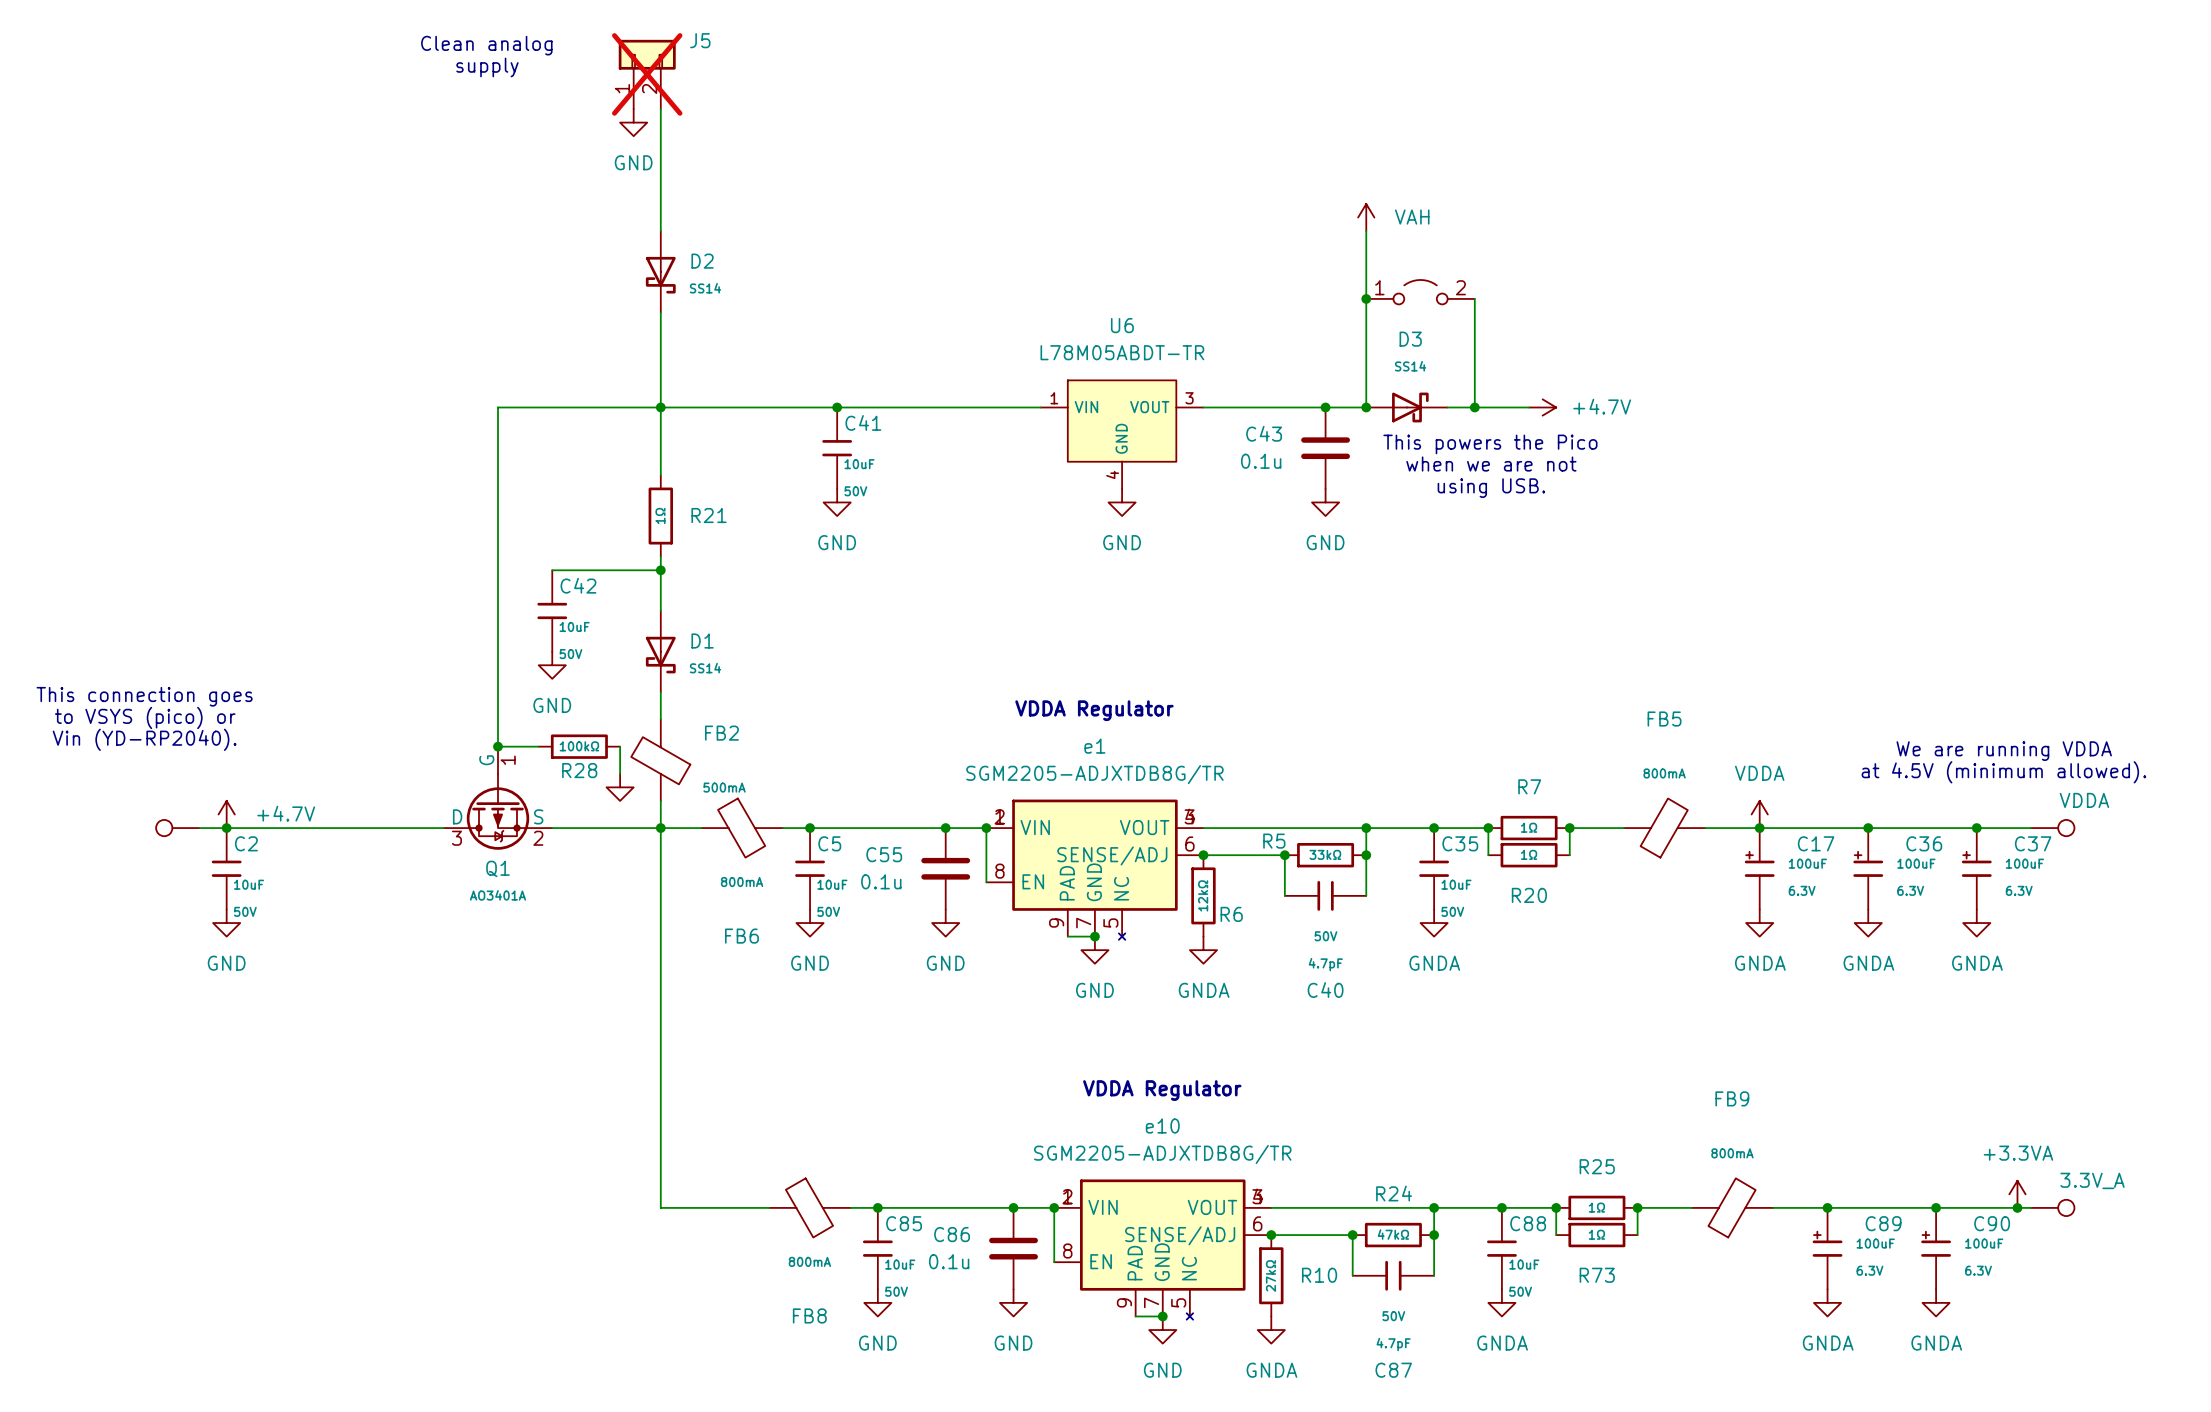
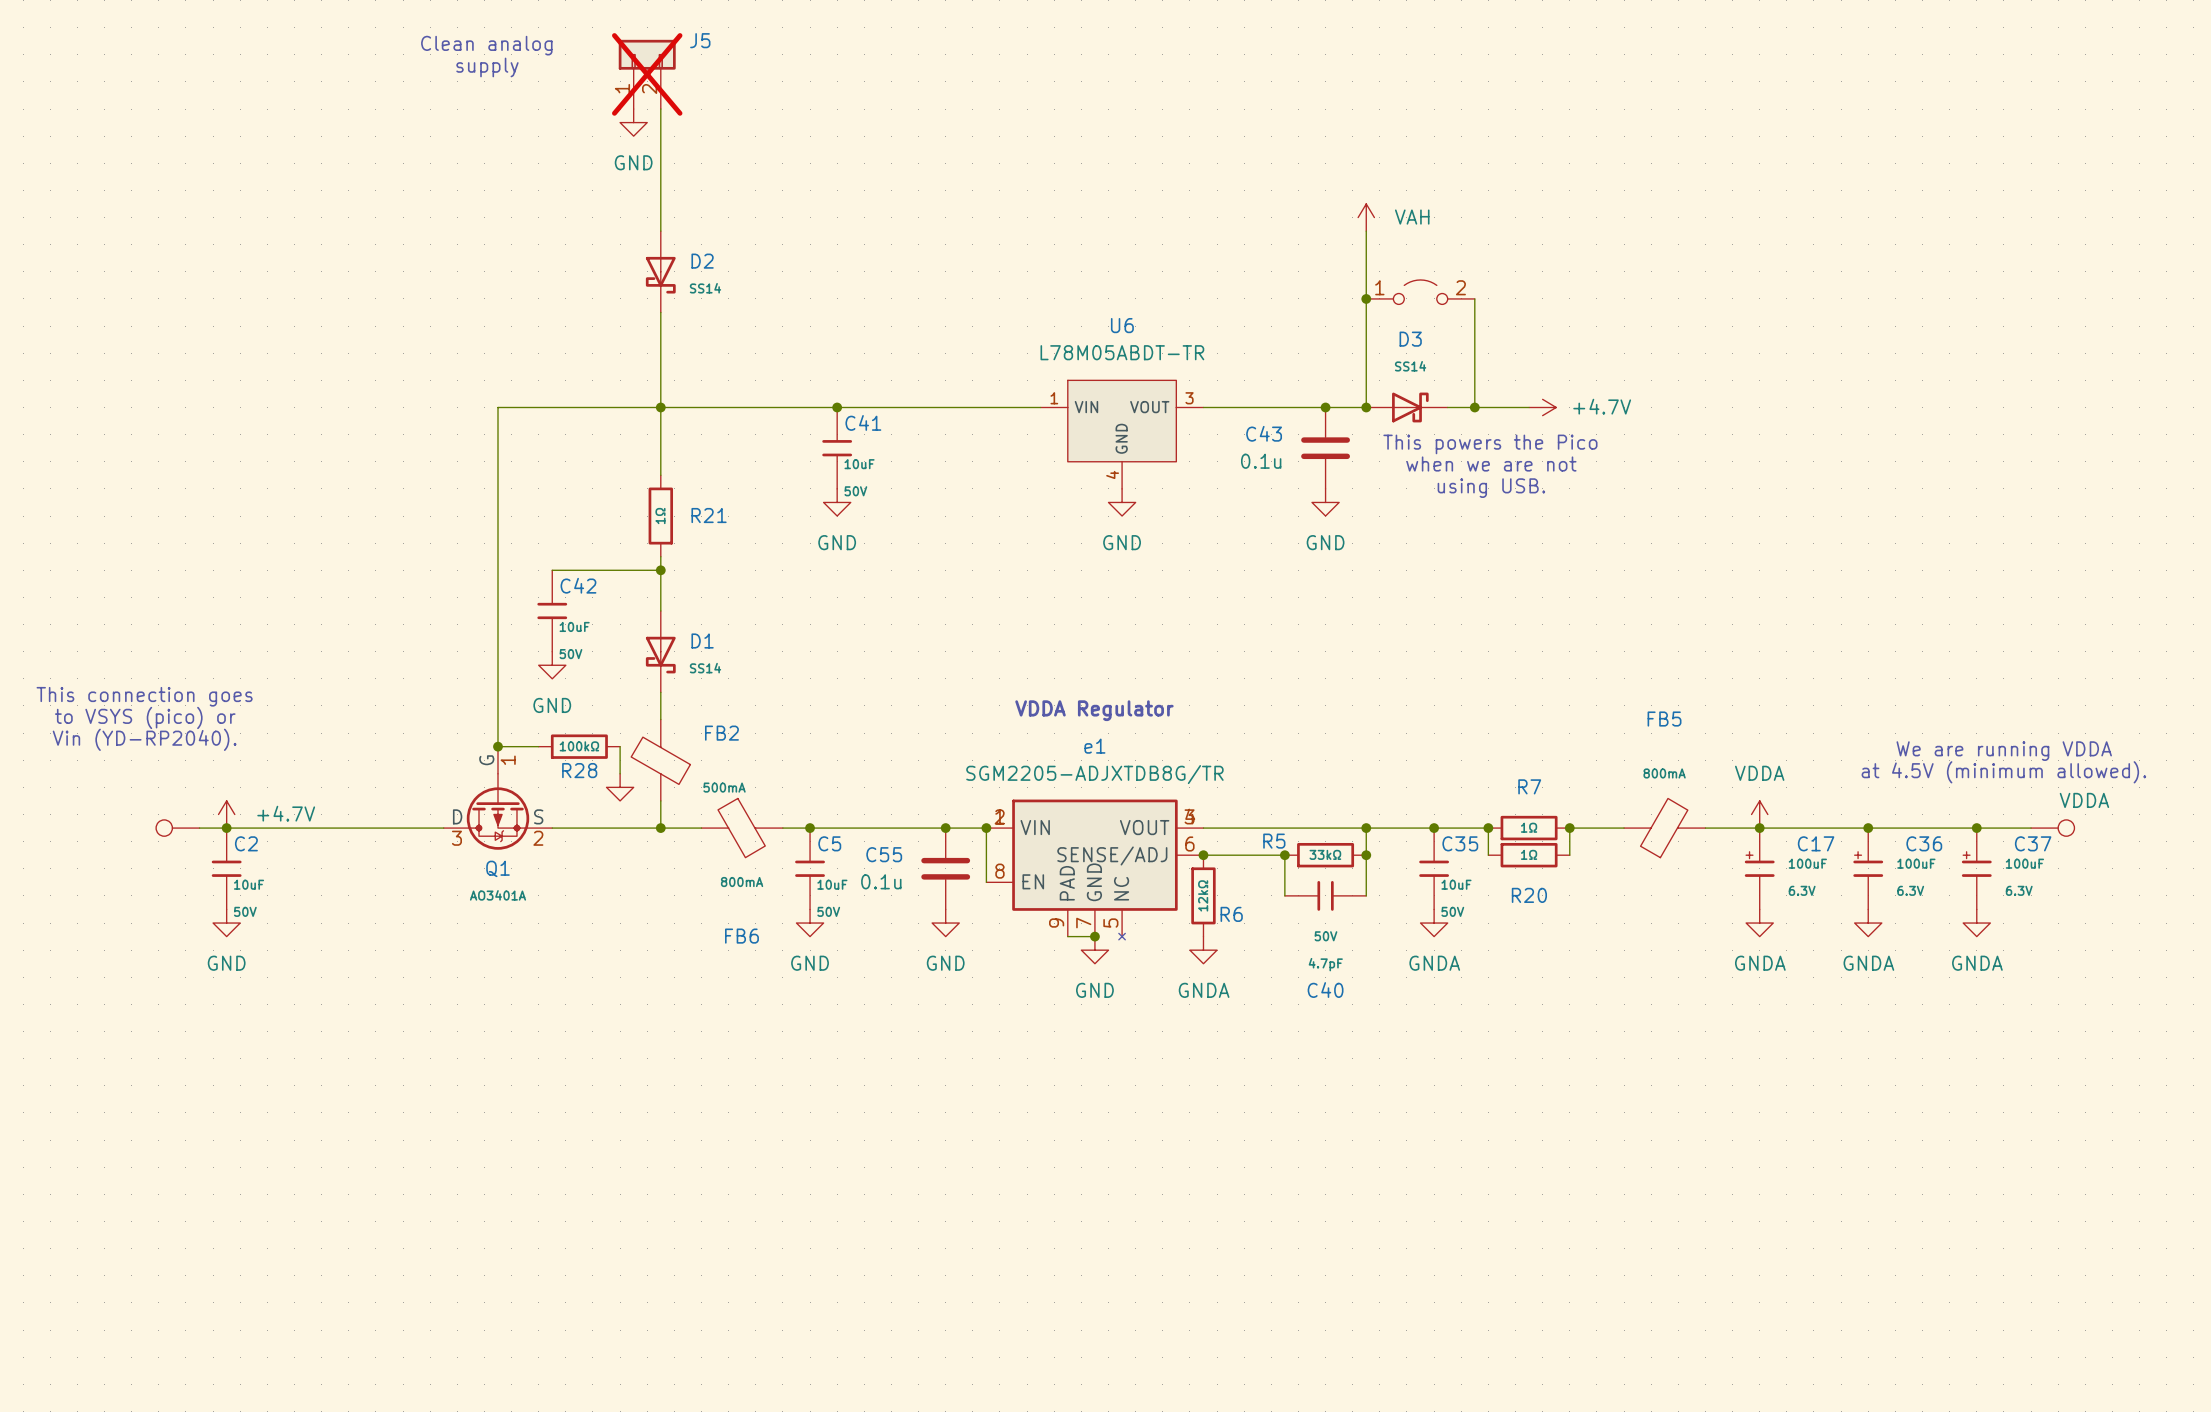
wire: (660, 828) (660, 1207) (769, 1207) -> none
text: VDDA Regulator (1162, 1090) -> none
power symbol: +3.3VA (2017, 1194) -> none
FB8: (810, 1207) -> none
wire: (850, 1207) (1054, 1207) (1054, 1262) -> none
junction: (877, 1207) -> none
junction: (1013, 1207) -> none
junction: (1054, 1207) -> none
wire: (1271, 1207) (1556, 1207) (1556, 1235) -> none
wire: (1434, 1207) (1434, 1275) -> none
junction: (1434, 1207) -> none
junction: (1501, 1207) -> none
junction: (1556, 1207) -> none
R25: 1Ω (1596, 1207) -> none
junction: (1637, 1207) -> none
wire: (1691, 1207) (1637, 1207) (1637, 1235) -> none
FB9: (1732, 1207) -> none
wire: (1773, 1207) (2031, 1207) -> none
junction: (1827, 1207) -> none
junction: (1936, 1207) -> none
junction: (2017, 1207) -> none
part: 3.3V_A (2052, 1207) -> none
wire: (1271, 1235) (1352, 1235) (1352, 1275) -> none
junction: (1271, 1235) -> none
junction: (1352, 1235) -> none
R24: 47kΩ (1393, 1235) -> none
junction: (1434, 1235) -> none
R73: 1Ω (1596, 1235) -> none
C85: 10uF (877, 1248) -> none
C86: 0.1u (1013, 1248) -> none
C88: 10uF (1501, 1248) -> none
C89: 100uF (1827, 1248) -> none
C90: 100uF (1936, 1248) -> none
e10: SGM2205-ADJXTDB8G/TR (1162, 1249) -> none
R10: 27kΩ (1271, 1275) -> none
C87: 4.7pF (1393, 1275) -> none
power symbol: GND (877, 1302) -> none
power symbol: GND (1013, 1302) -> none
power symbol: GNDA (1501, 1302) -> none
power symbol: GNDA (1827, 1302) -> none
power symbol: GNDA (1936, 1302) -> none
wire: (1135, 1316) (1162, 1316) -> none
junction: (1162, 1316) -> none
power symbol: GND (1162, 1330) -> none
power symbol: GNDA (1271, 1330) -> none

